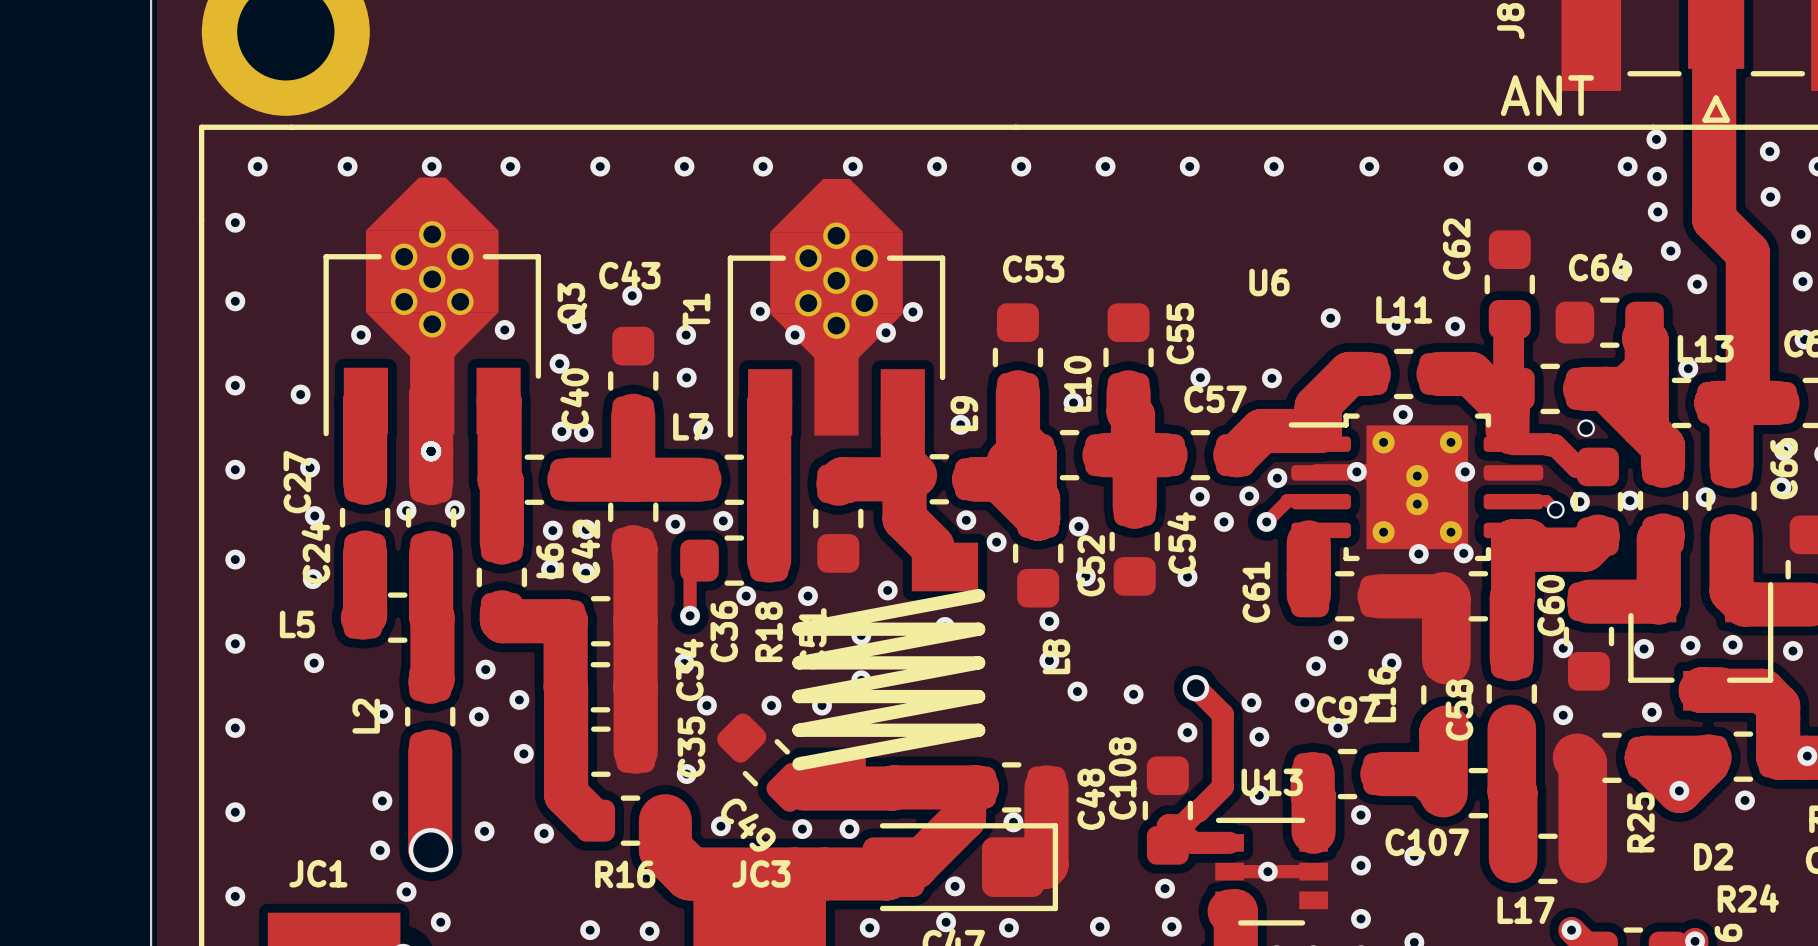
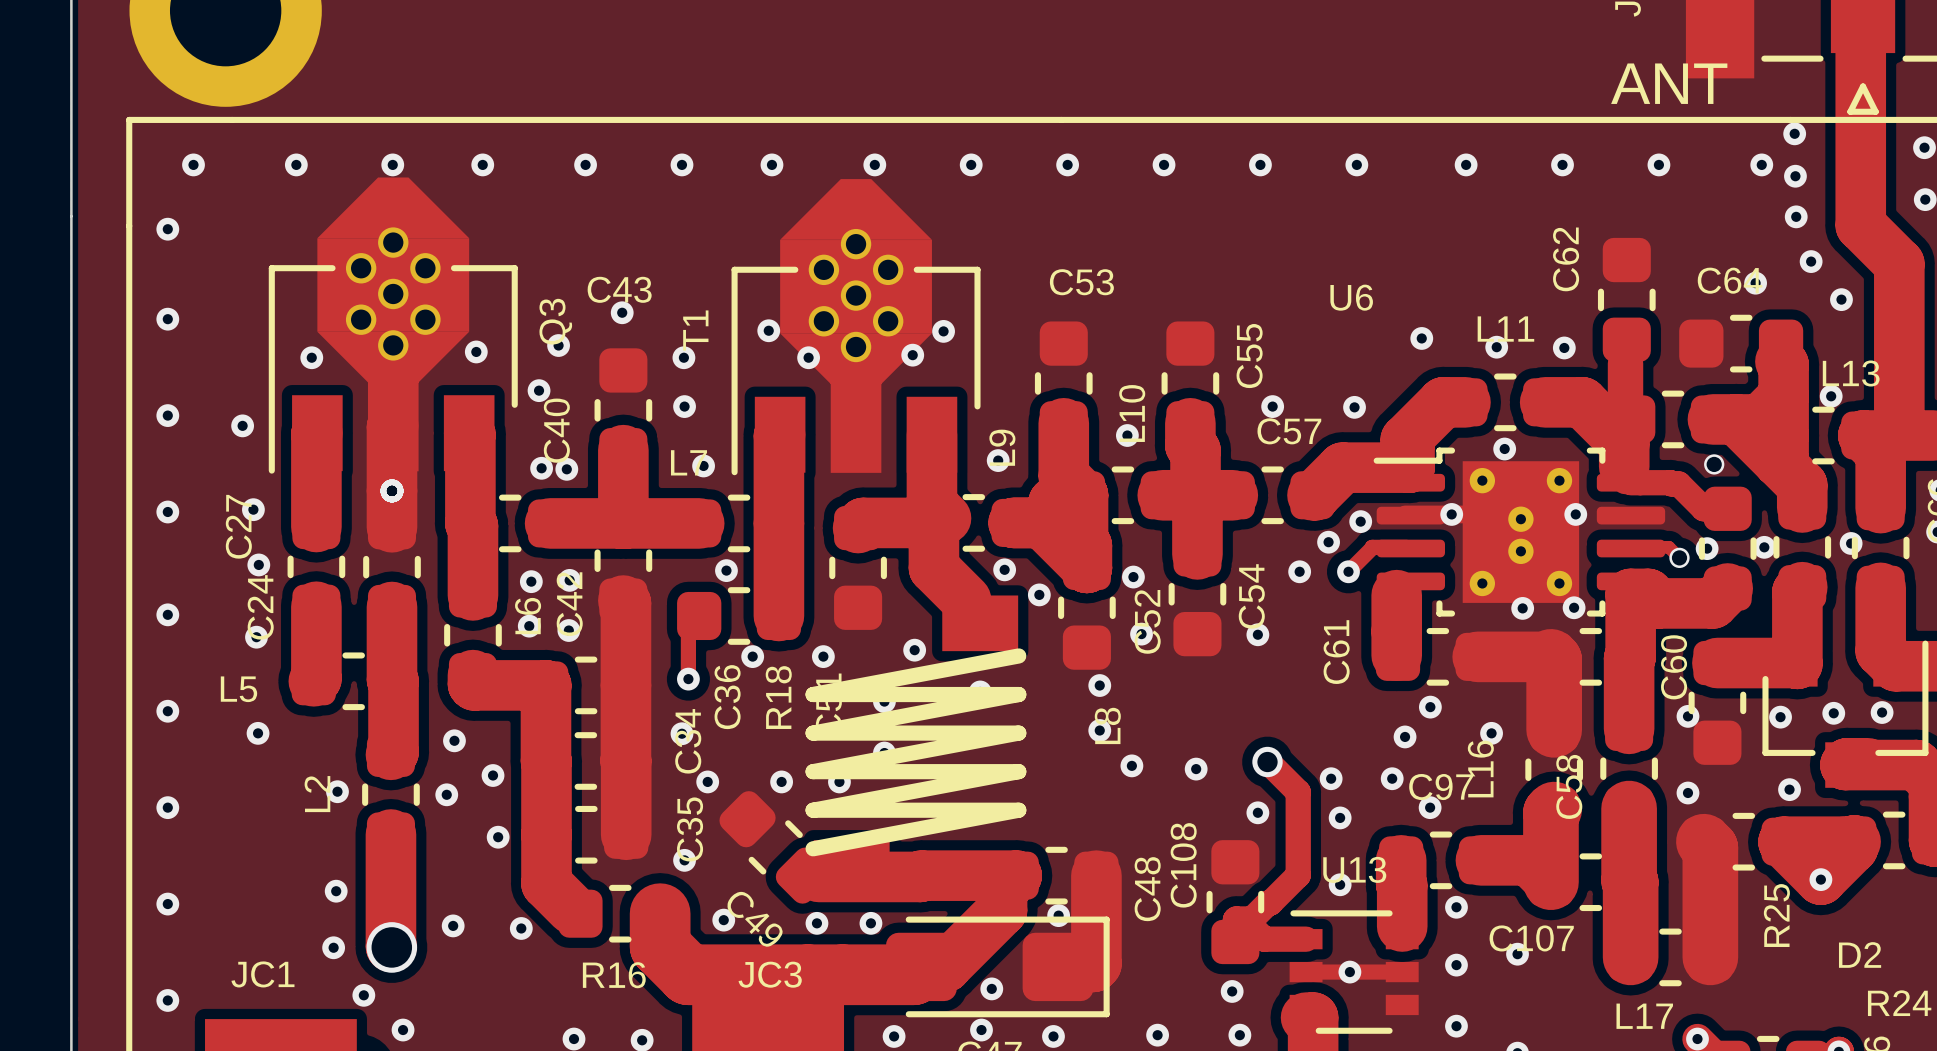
via: (1199, 496) -> none
via: (406, 510) -> none
via: (454, 510) -> none
via: (675, 524) -> none
via: (1745, 800) -> none

